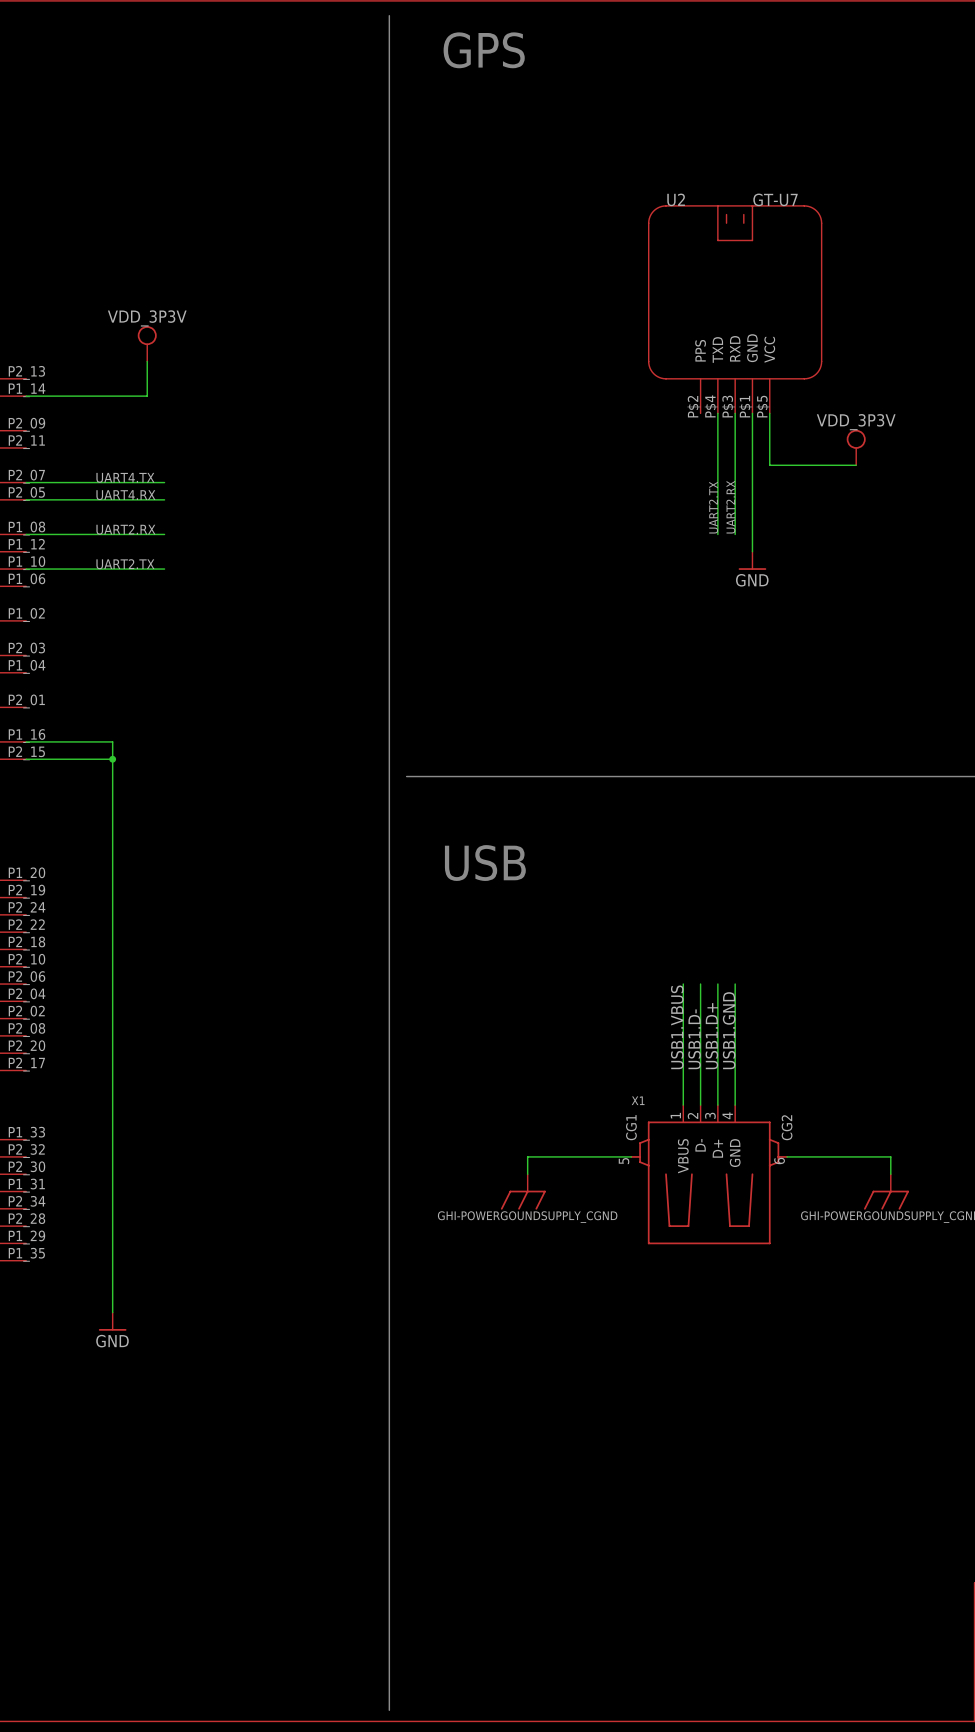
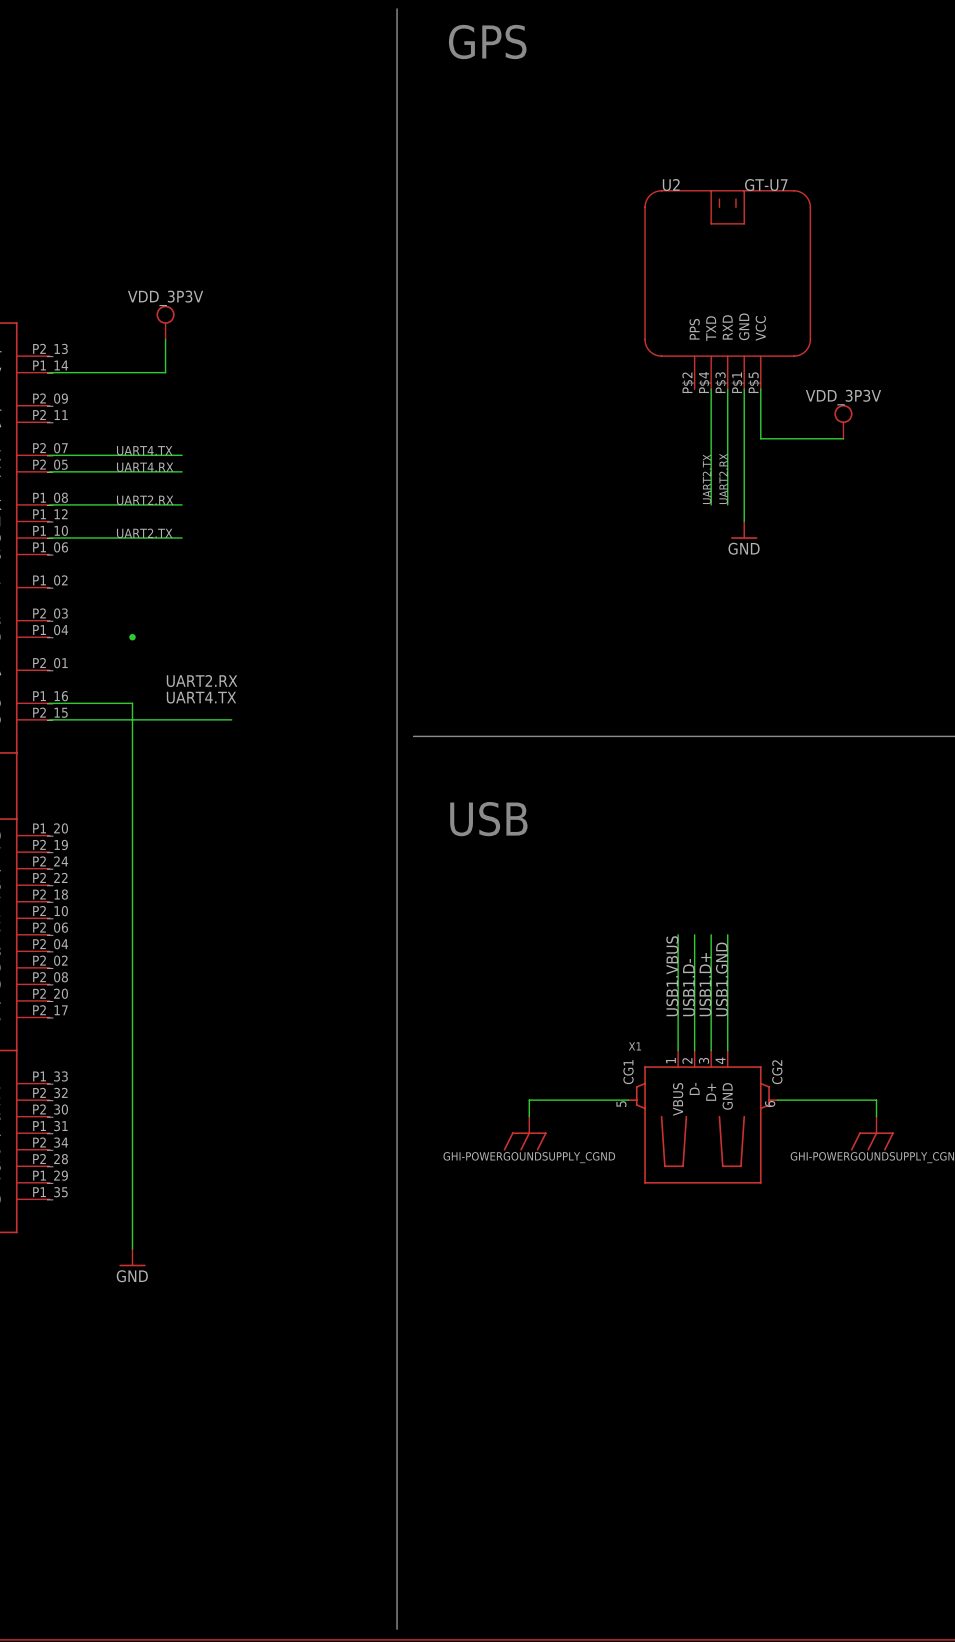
junction: none -> (132, 637)
label: none -> UART2.RX (202, 681)
label: none -> UART4.TX (201, 697)
wire: none -> (132, 719) (231, 719)
junction: (112, 759) -> none

